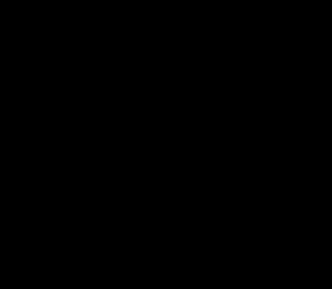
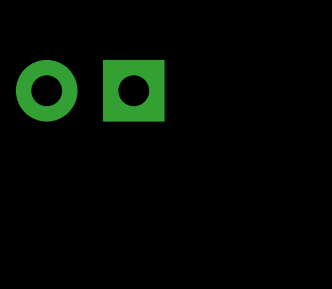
part: none -> (90, 90)

